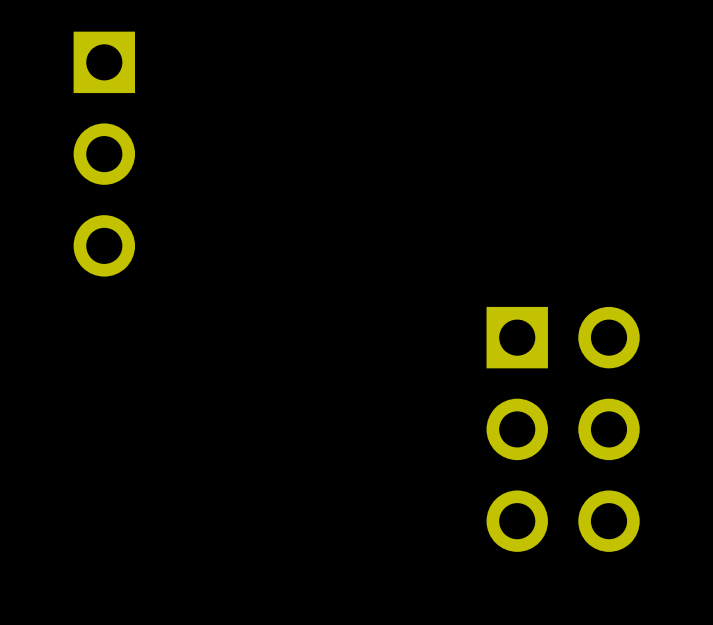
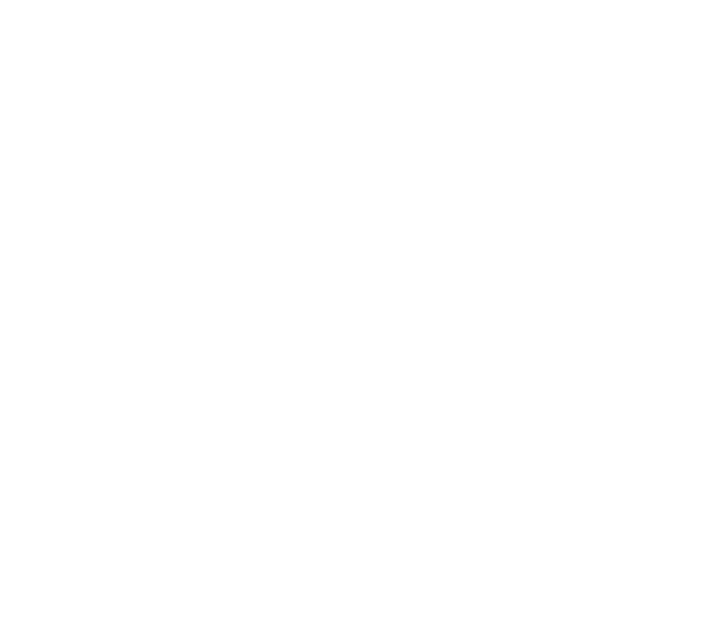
part: (104, 154) -> none
part: (563, 429) -> none

